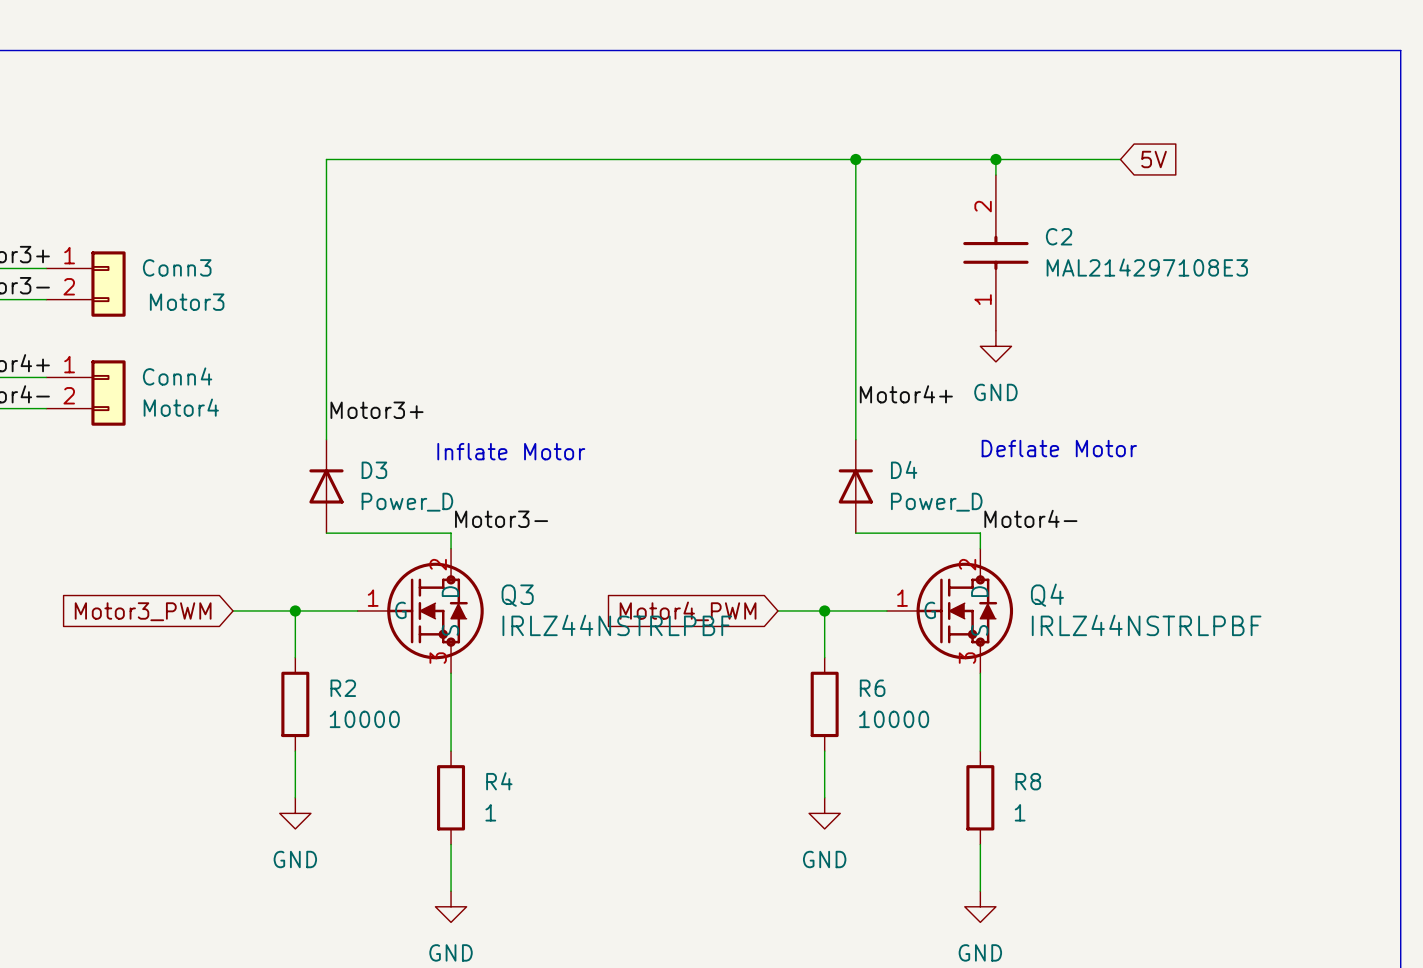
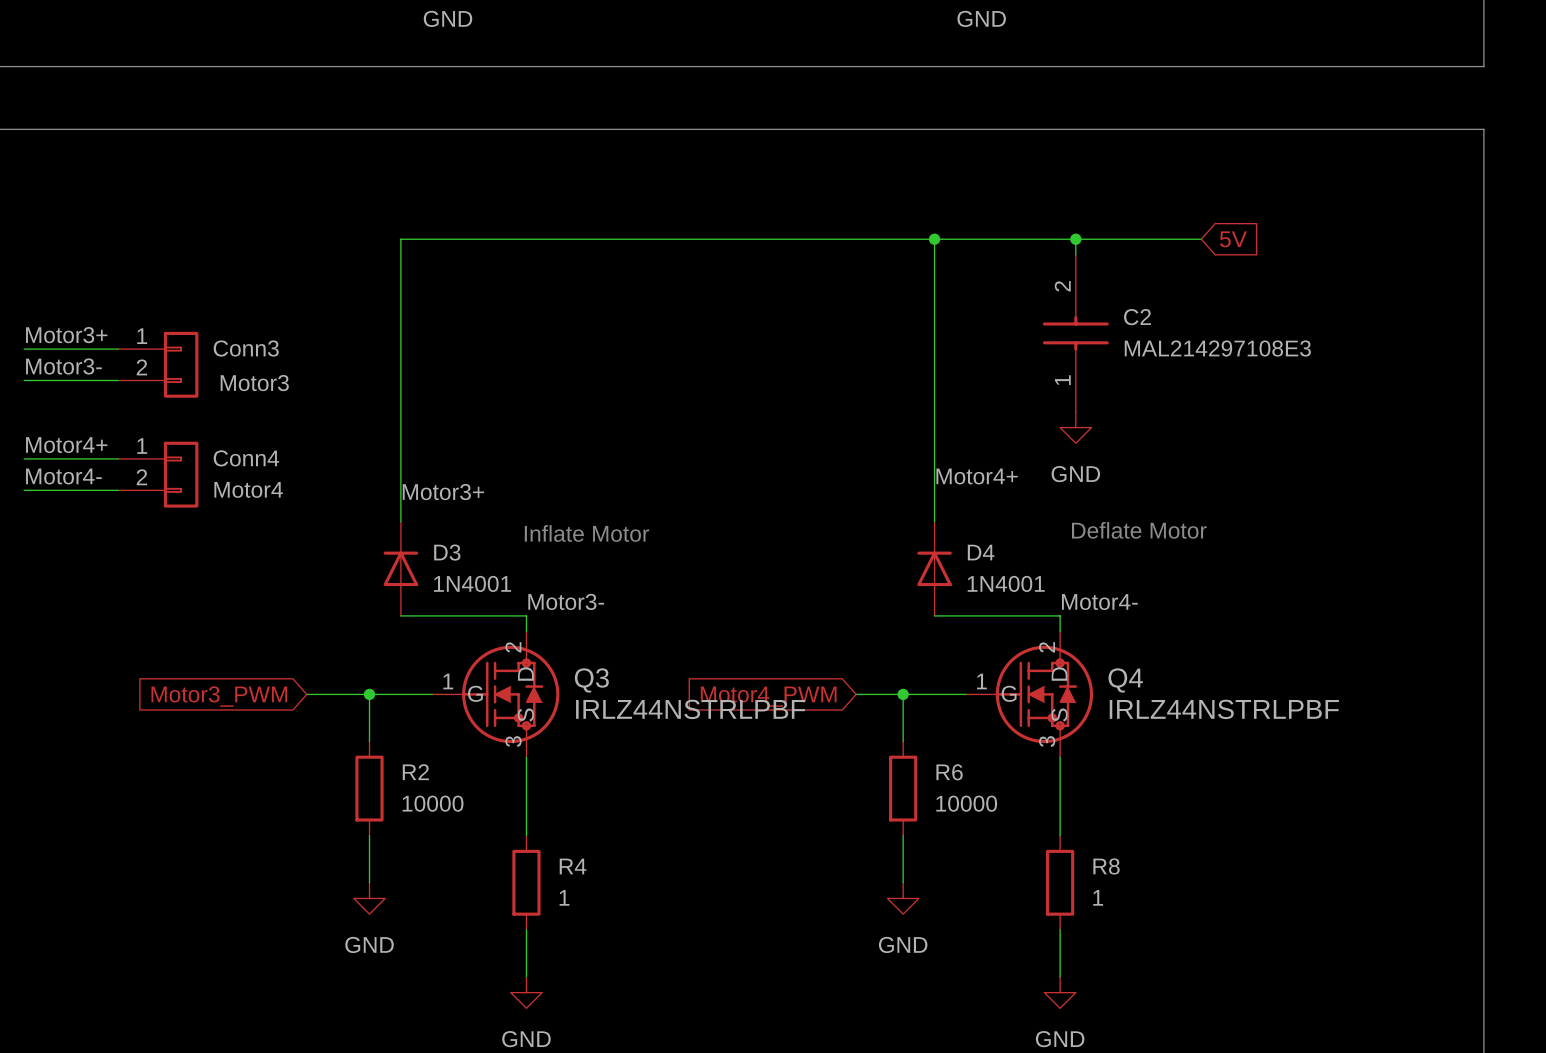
D3 value: Power_D (407, 502) -> 1N4001 (472, 583)
D4 value: Power_D (936, 502) -> 1N4001 (1006, 583)

